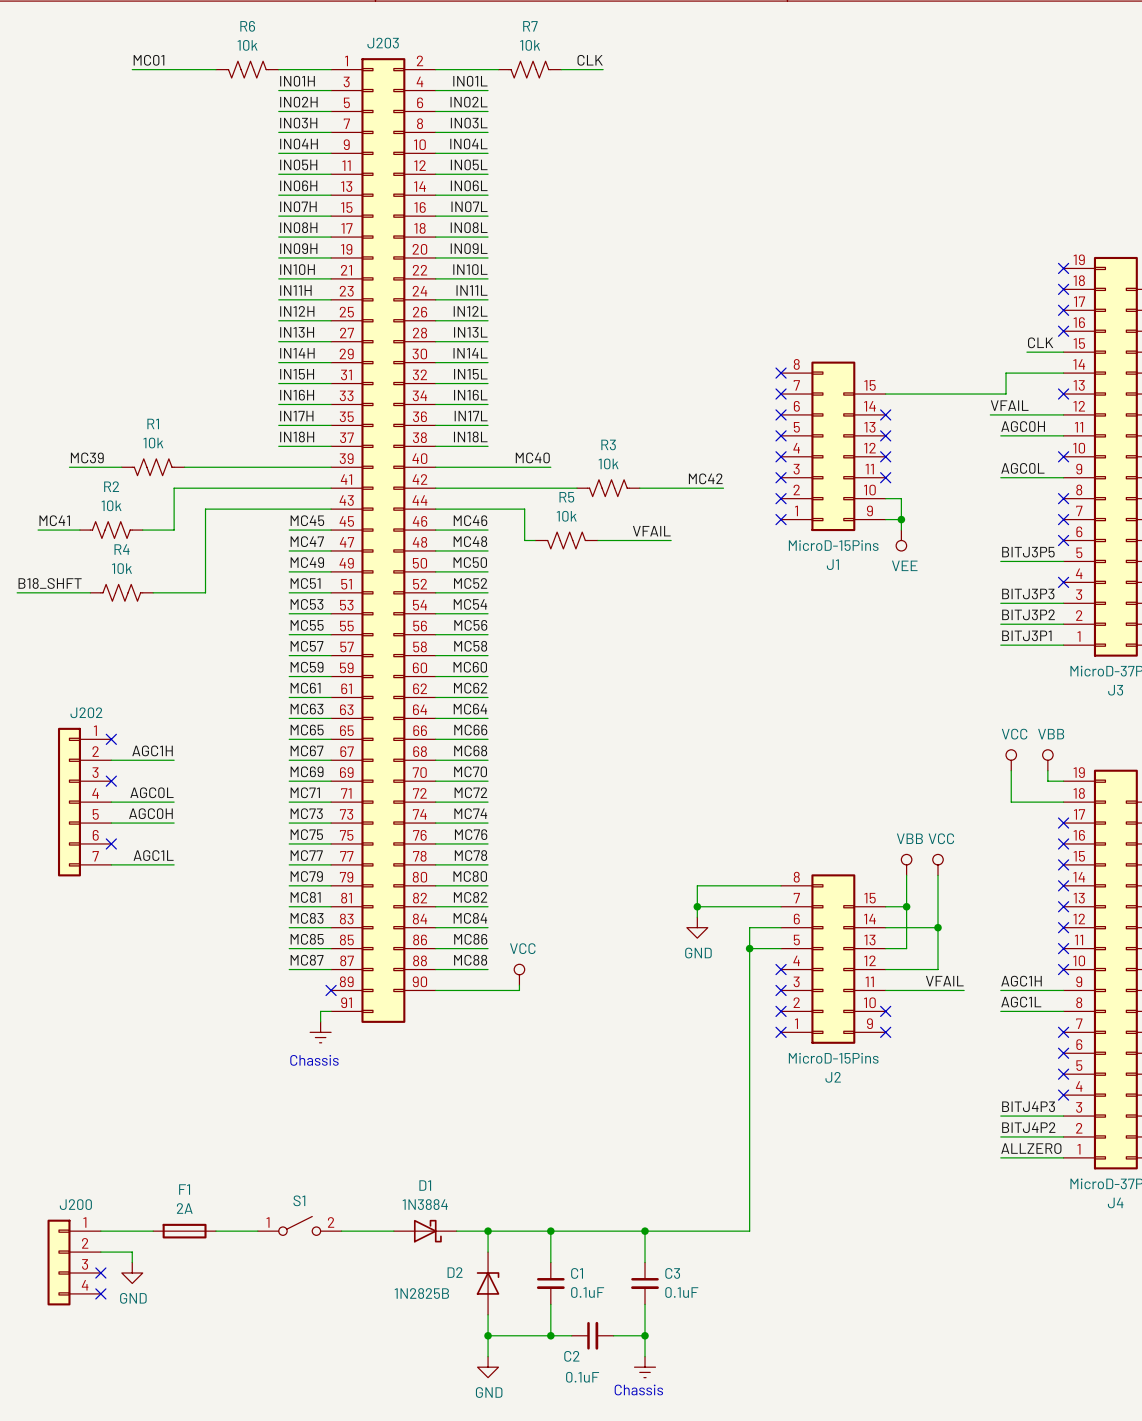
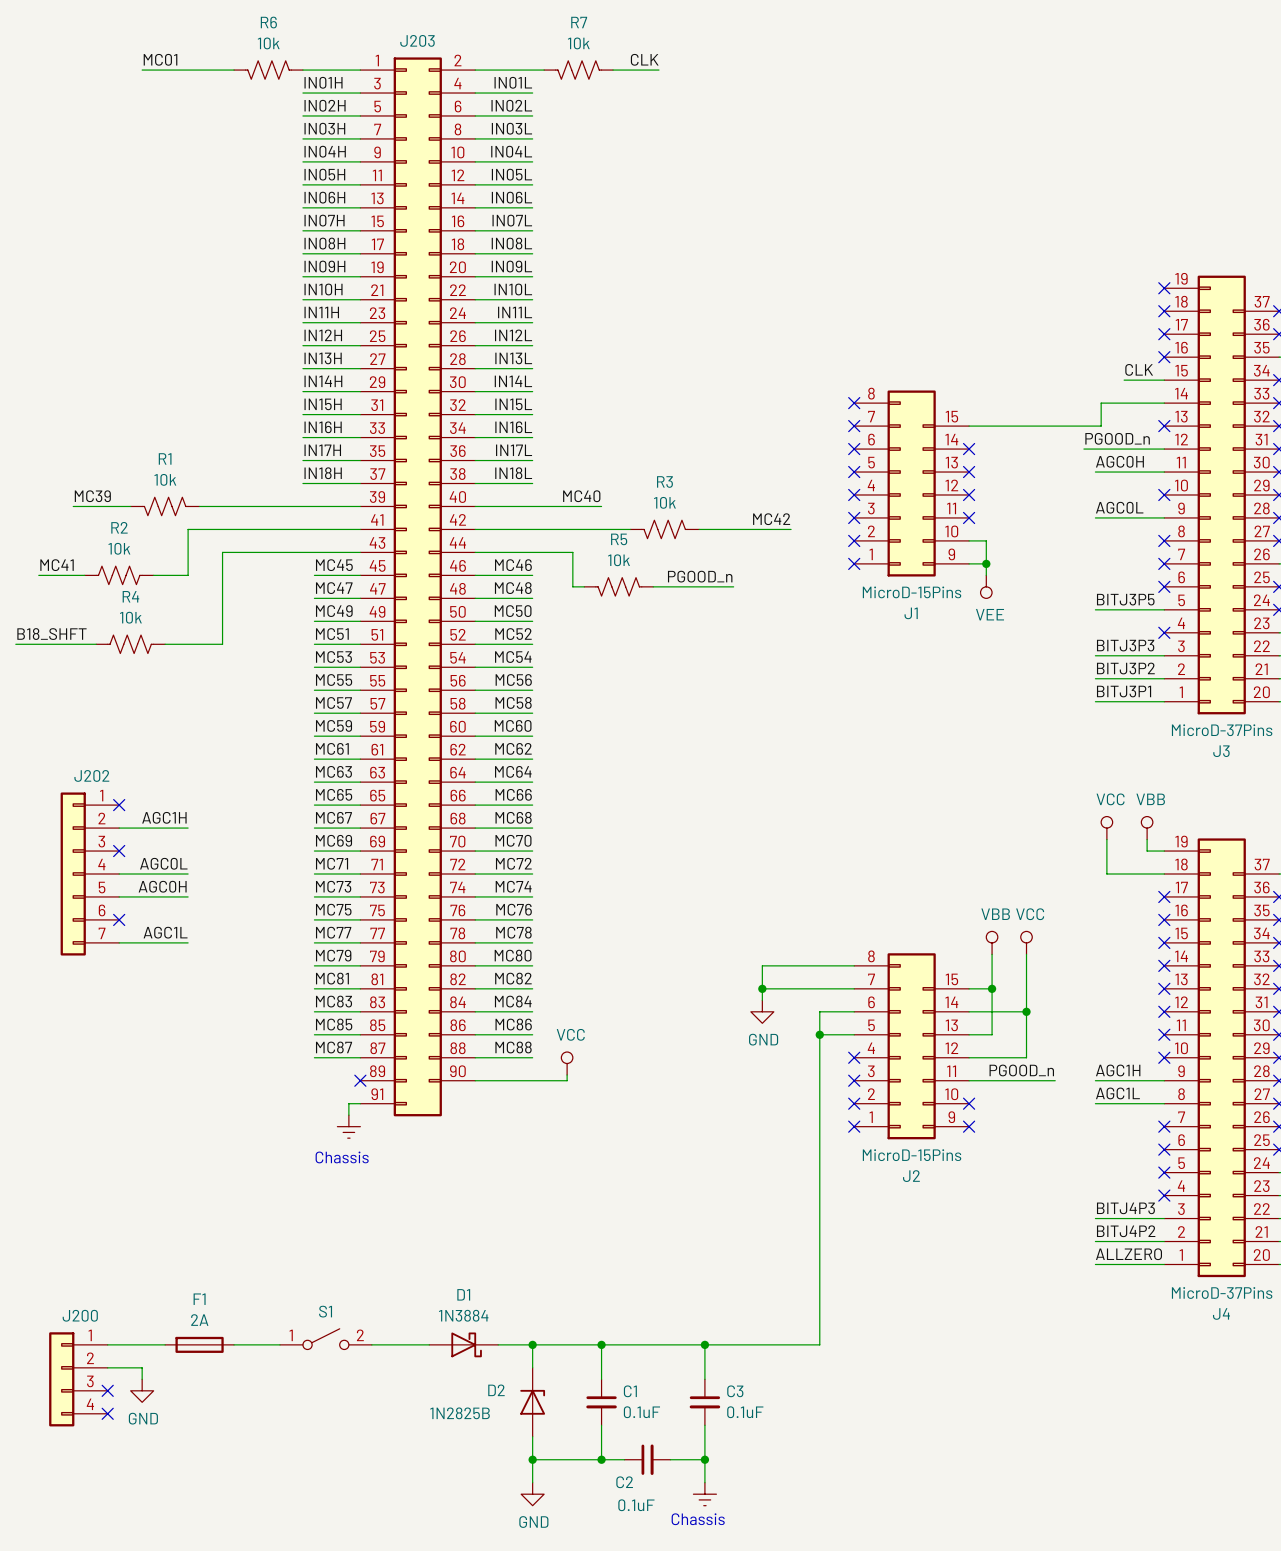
label: VFAIL (1009, 405) -> PGOOD_n (1117, 438)
label: VFAIL (651, 531) -> PGOOD_n (700, 576)
label: VFAIL (944, 981) -> PGOOD_n (1021, 1070)

